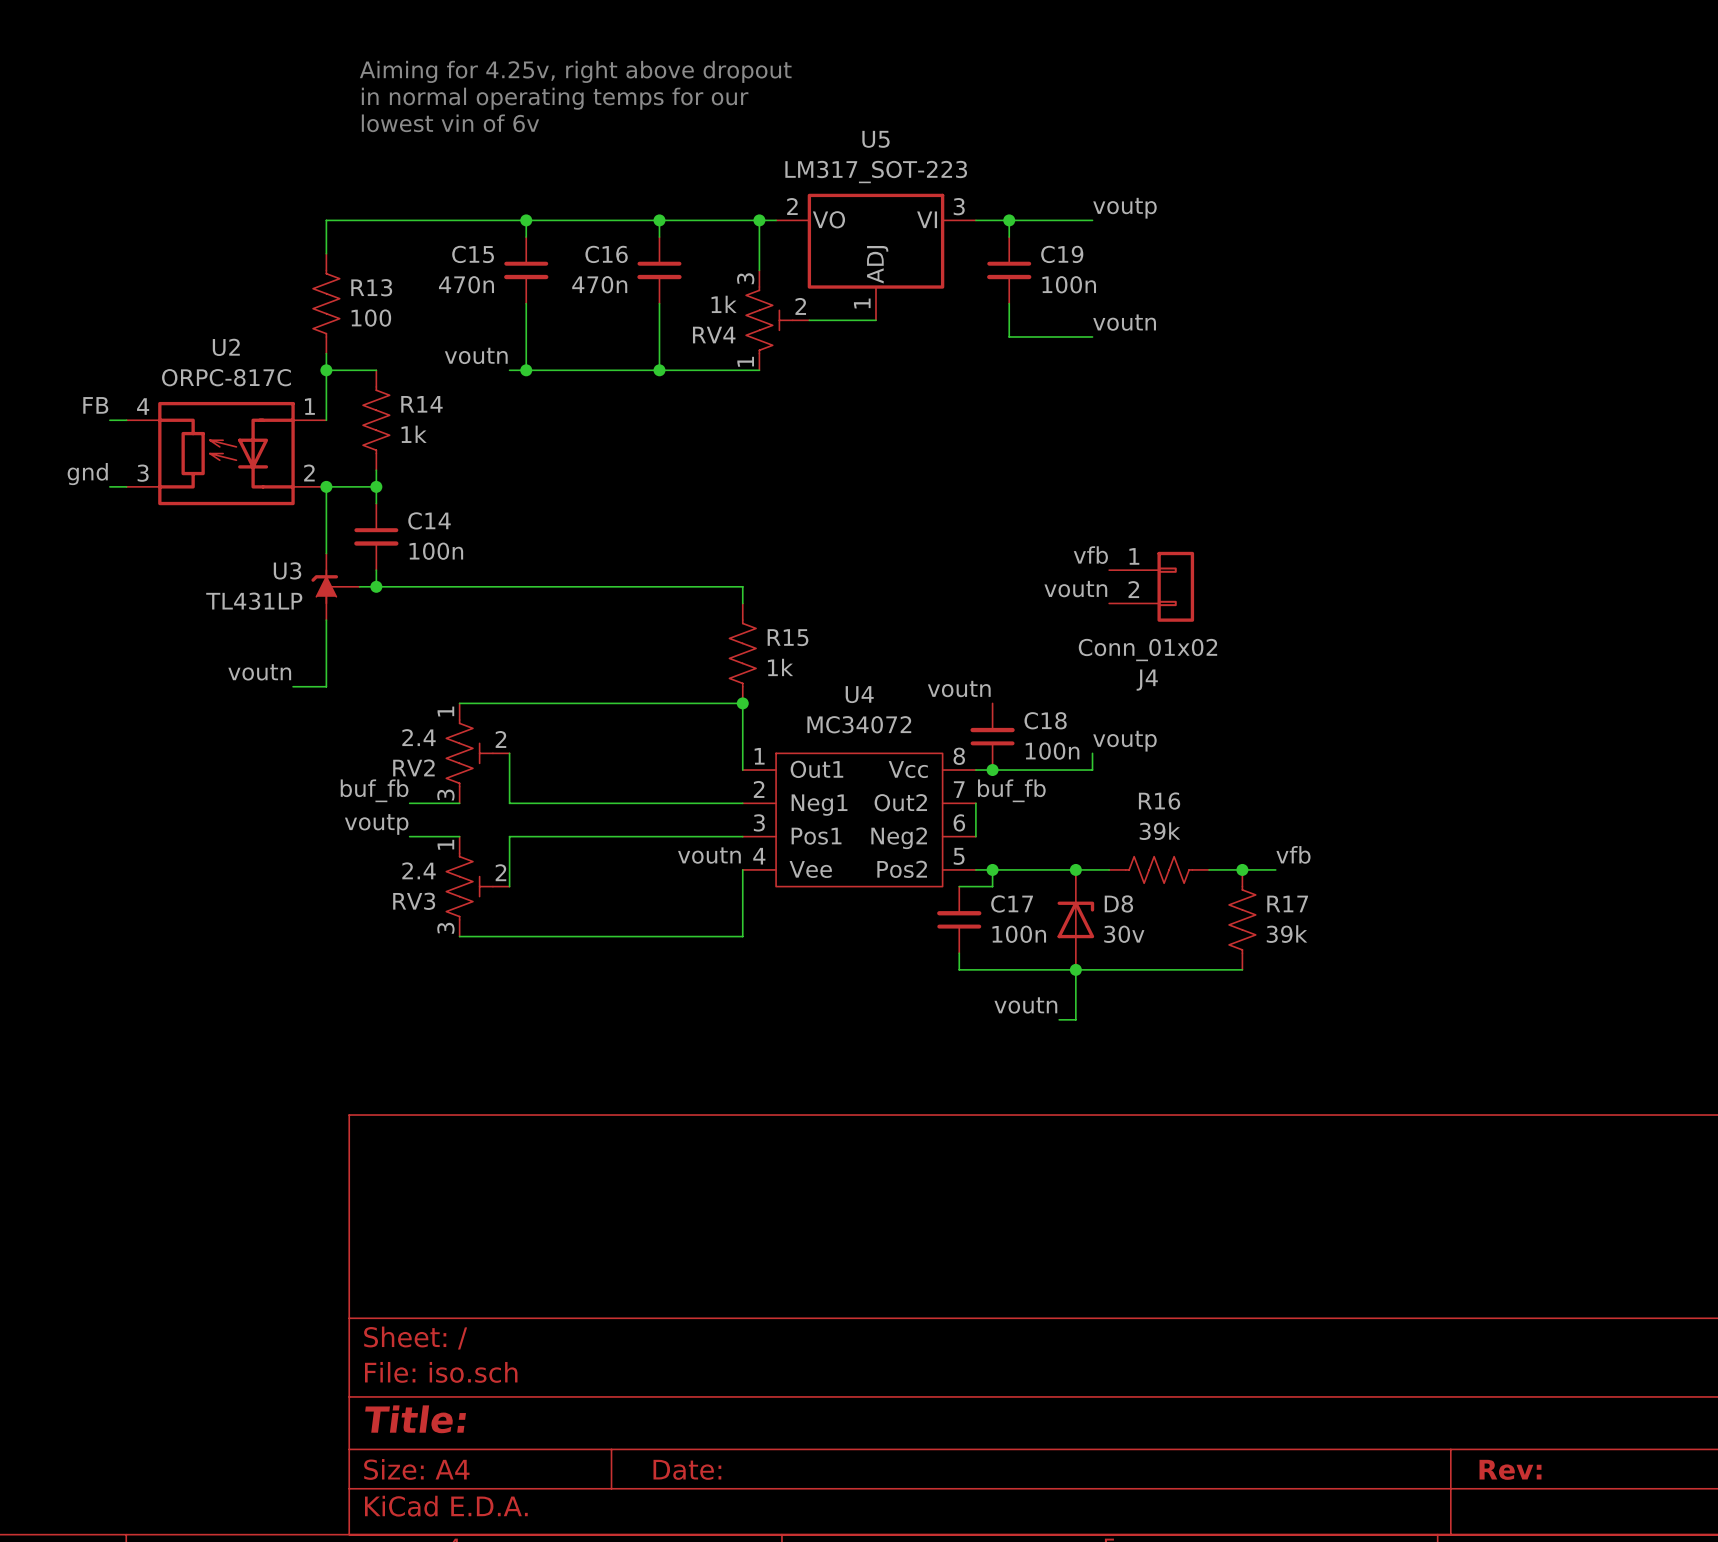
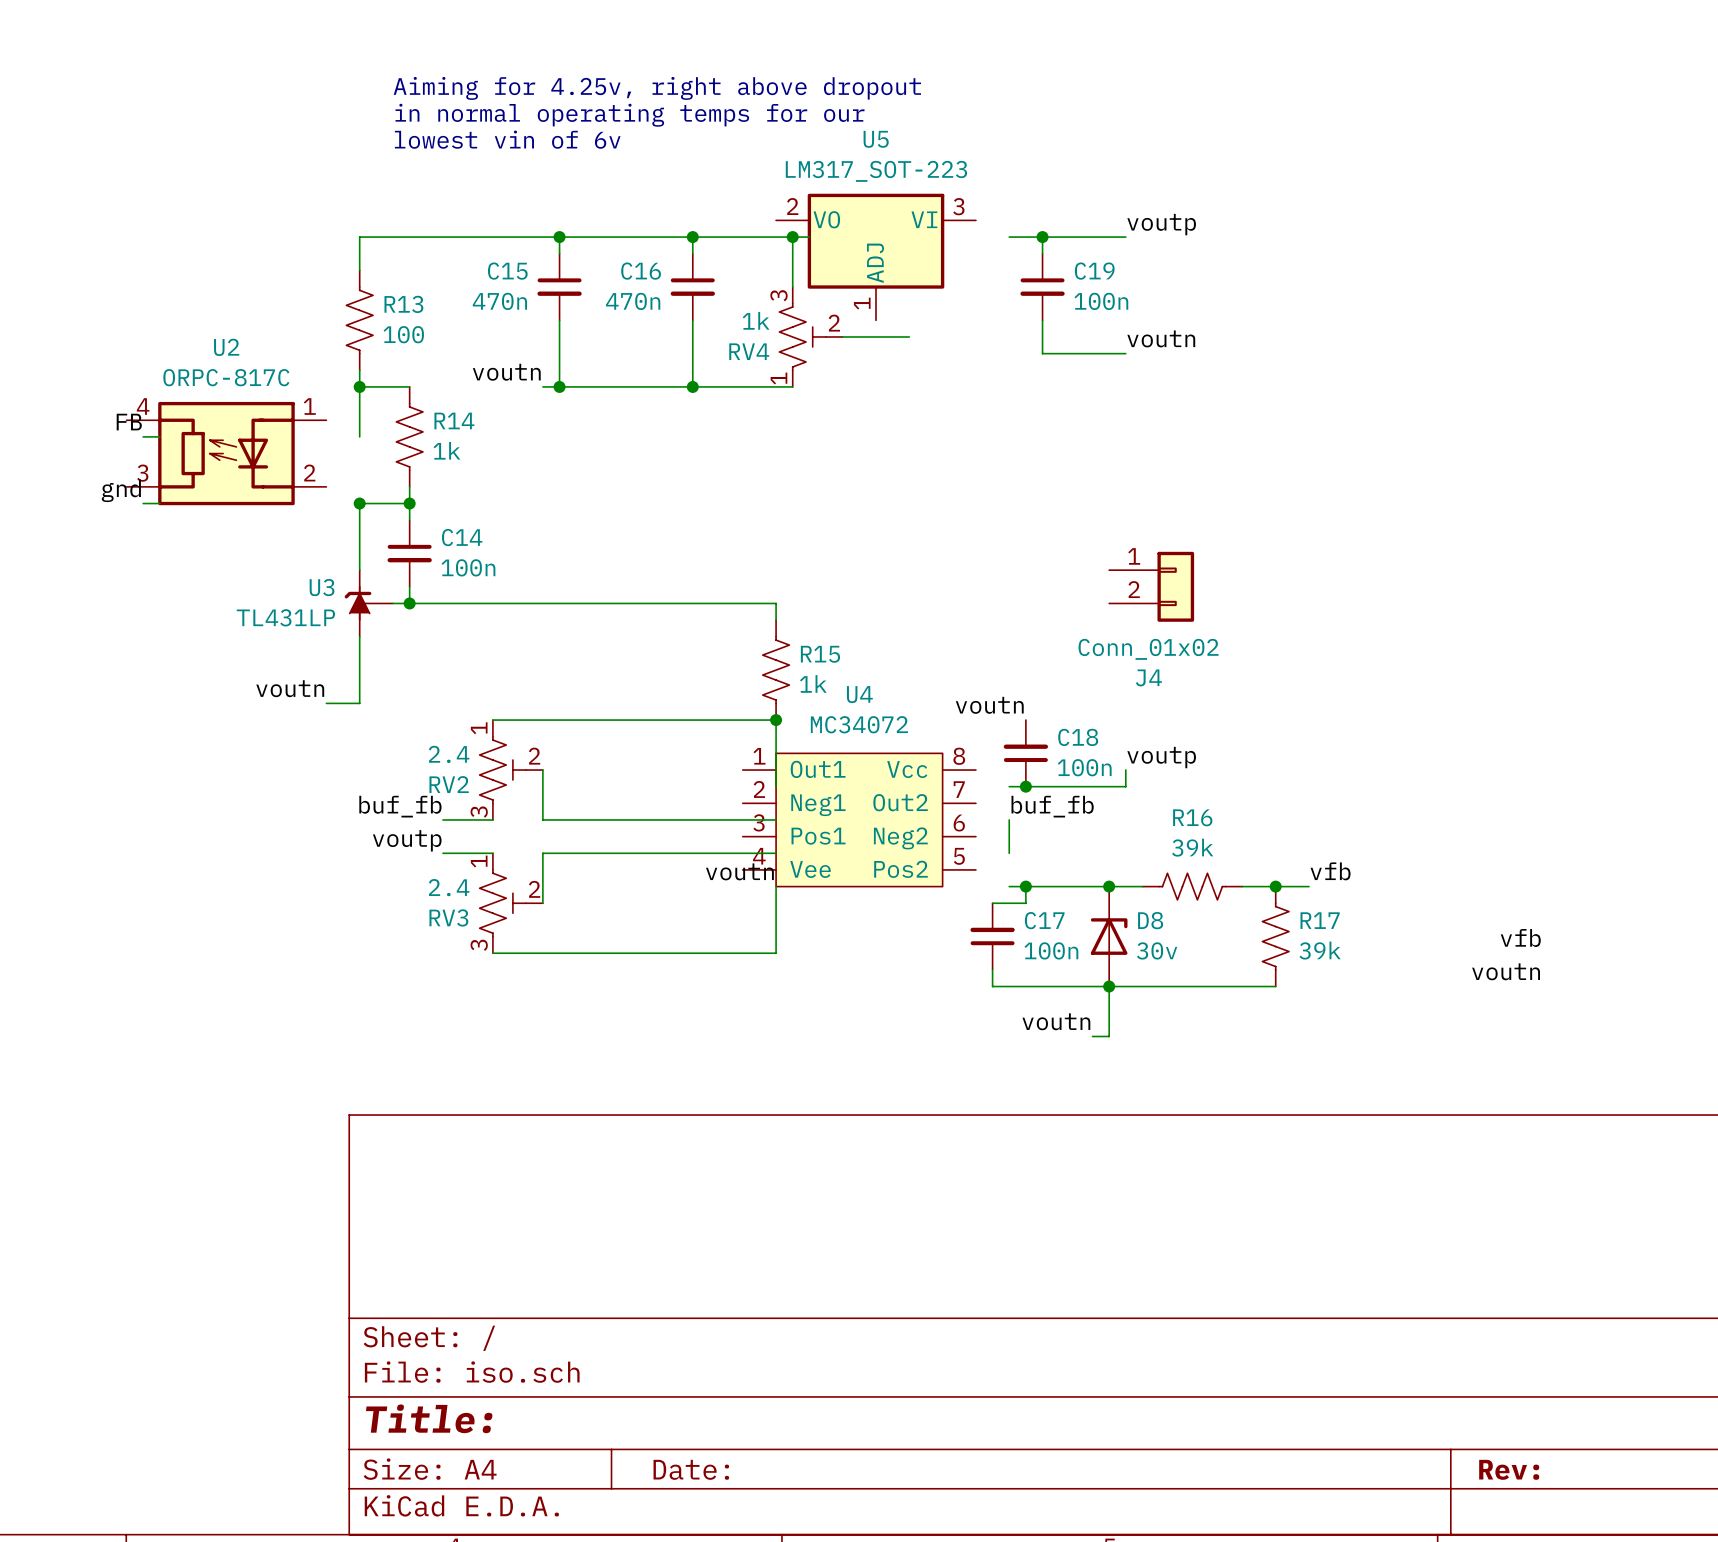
text position: Aiming for 4.25v, right above dropout (575, 71) -> Aiming for 4.25v, right above dropout (657, 88)
text position: in normal operating temps for our (555, 98) -> in normal operating temps for our (630, 115)
text position: lowest vin of 6v (450, 123) -> lowest vin of 6v (507, 139)
label position: voutp (1124, 208) -> voutp (1161, 224)
wire: (526, 220) (526, 237) -> (559, 237) (559, 253)
junction position: (526, 220) -> (559, 237)
wire: (659, 220) (659, 237) -> (692, 237) (692, 253)
junction: (659, 220) -> none
wire: (759, 220) (759, 270) -> (792, 237) (792, 287)
junction: (759, 220) -> none
wire: (776, 220) (326, 220) (326, 253) -> (809, 237) (359, 237) (359, 270)
wire: (975, 220) (1092, 220) -> none
wire: (1009, 220) (1009, 237) -> (1125, 237) (1009, 237)
junction position: (1009, 220) -> (1042, 237)
junction: none -> (692, 237)
junction: none -> (792, 237)
wire: none -> (1042, 237) (1042, 253)
C15 position: (526, 270) -> (559, 287)
C16 position: (659, 270) -> (692, 287)
C19 position: (1009, 270) -> (1042, 287)
R13 position: (326, 303) -> (359, 320)
wire: (526, 303) (526, 370) -> (559, 320) (559, 386)
wire: (659, 303) (659, 370) -> (692, 320) (692, 386)
wire: (1009, 303) (1009, 336) (1092, 336) -> (1042, 320) (1042, 353) (1125, 353)
RV4 position: (777, 320) -> (811, 336)
wire: (809, 320) (875, 320) -> (842, 336) (909, 336)
label position: voutn (1124, 322) -> voutn (1161, 338)
wire: (326, 353) (326, 420) -> (359, 370) (359, 436)
label position: voutn (476, 355) -> voutn (506, 372)
wire: (326, 370) (376, 370) -> (359, 386) (409, 386)
junction position: (326, 370) -> (359, 386)
wire: (509, 370) (759, 370) -> (542, 386) (792, 386)
junction position: (526, 370) -> (559, 386)
junction position: (659, 370) -> (692, 386)
label position: FB (95, 405) -> FB (129, 422)
wire: (109, 420) (126, 420) -> (143, 436) (159, 436)
R14 position: (376, 420) -> (409, 436)
wire: (376, 470) (376, 503) -> (409, 486) (409, 520)
label position: gnd (87, 474) -> gnd (121, 490)
wire: (109, 486) (126, 486) -> (143, 503) (159, 503)
junction: (326, 486) -> none
wire: (376, 486) (326, 486) (326, 553) -> (409, 503) (359, 503) (359, 570)
junction: (376, 486) -> none
junction: none -> (359, 503)
junction: none -> (409, 503)
C14 position: (376, 536) -> (409, 553)
label: vfb (1090, 555) -> none
wire: (376, 570) (376, 586) -> (409, 586) (409, 603)
U3 position: (335, 586) -> (368, 603)
wire: (359, 586) (742, 586) (742, 603) -> (393, 603) (776, 603) (776, 620)
junction position: (376, 586) -> (409, 603)
label: voutn (1075, 589) -> none
wire: (326, 620) (326, 686) (293, 686) -> (359, 636) (359, 703) (326, 703)
R15 position: (742, 653) -> (776, 670)
label position: voutn (259, 672) -> voutn (290, 688)
label position: voutn (959, 689) -> voutn (989, 705)
wire: (459, 703) (742, 703) (742, 770) -> (492, 720) (776, 720) (776, 786)
junction position: (742, 703) -> (776, 720)
C18 position: (992, 736) -> (1025, 753)
label position: voutp (1124, 741) -> voutp (1161, 757)
RV2 position: (477, 753) -> (511, 770)
wire: (509, 753) (509, 803) (742, 803) -> (542, 770) (542, 819) (776, 819)
wire: (1092, 753) (1092, 770) (975, 770) -> (1125, 770) (1125, 786) (1009, 786)
junction position: (992, 770) -> (1025, 786)
label position: buf_fb (374, 790) -> buf_fb (400, 806)
label position: buf_fb (1011, 790) -> buf_fb (1052, 806)
wire: (409, 803) (459, 803) -> (442, 819) (492, 819)
wire: (975, 803) (975, 836) -> (1009, 819) (1009, 853)
label position: voutp (376, 824) -> voutp (407, 840)
wire: (409, 836) (459, 836) -> (442, 853) (492, 853)
wire: (742, 836) (509, 836) (509, 886) -> (776, 853) (542, 853) (542, 903)
label position: vfb (1293, 854) -> vfb (1330, 871)
label position: voutn (709, 855) -> voutn (739, 871)
wire: (742, 869) (742, 936) (459, 936) -> (776, 886) (776, 953) (492, 953)
wire: (975, 869) (1109, 869) -> (1009, 886) (1142, 886)
wire: (992, 869) (992, 886) (959, 886) -> (1025, 886) (1025, 903) (992, 903)
junction: (992, 869) -> none
junction: (1075, 869) -> none
R16 position: (1159, 869) -> (1192, 886)
wire: (1209, 869) (1275, 869) -> (1242, 886) (1309, 886)
junction position: (1242, 869) -> (1275, 886)
RV3 position: (477, 886) -> (511, 903)
junction: none -> (1025, 886)
junction: none -> (1109, 886)
C17 position: (959, 919) -> (992, 936)
D8 position: (1075, 919) -> (1109, 936)
R17 position: (1242, 919) -> (1275, 936)
label: none -> vfb (1520, 938)
wire: (959, 953) (959, 969) (1242, 969) -> (992, 969) (992, 986) (1275, 986)
wire: (1075, 969) (1075, 1019) (1059, 1019) -> (1109, 986) (1109, 1036) (1092, 1036)
junction position: (1075, 969) -> (1109, 986)
label: none -> voutn (1506, 971)
label position: voutn (1025, 1005) -> voutn (1056, 1021)

